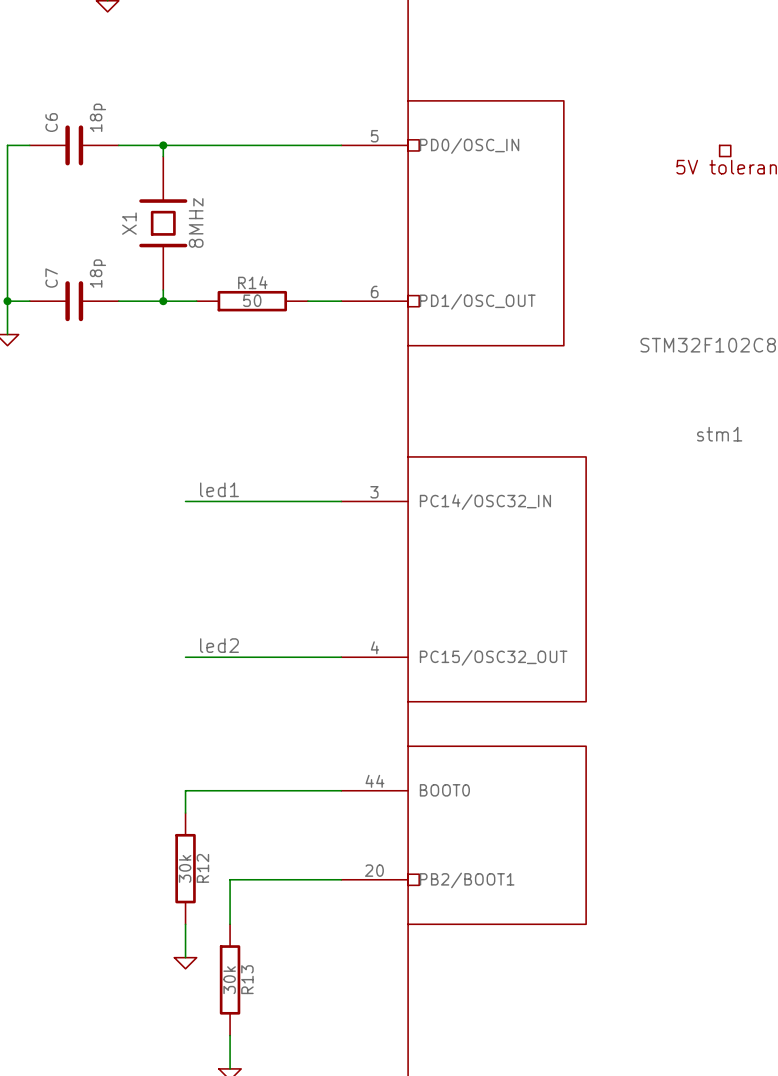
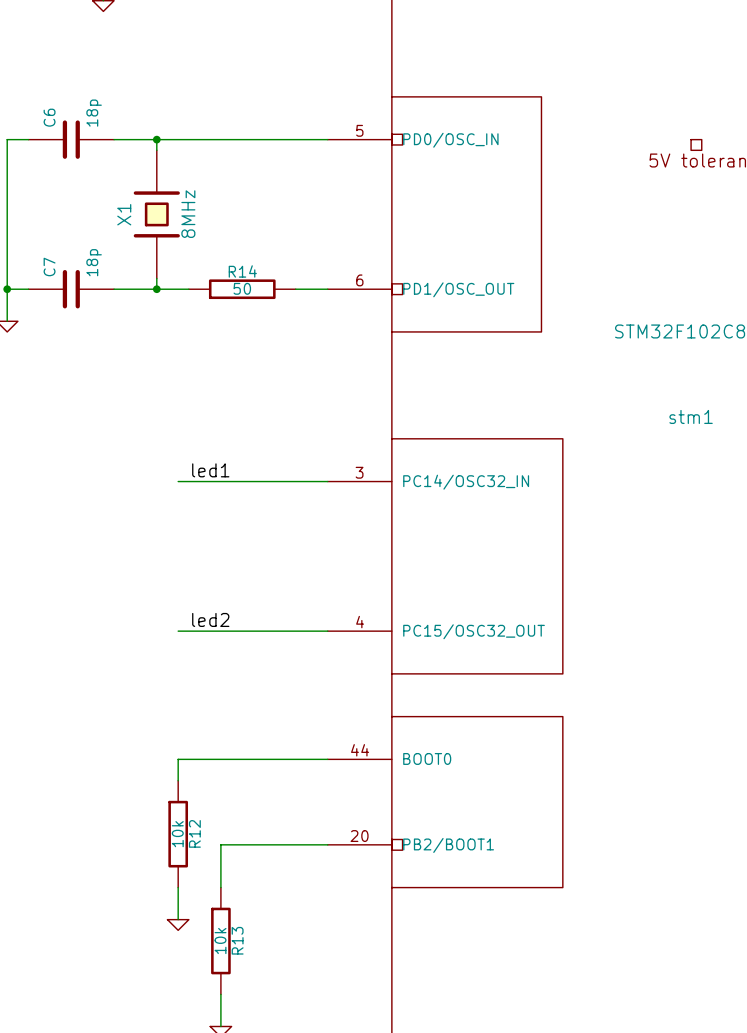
R12 value: 30k (185, 868) -> 10k (177, 834)
R13 value: 30k (229, 980) -> 10k (220, 941)

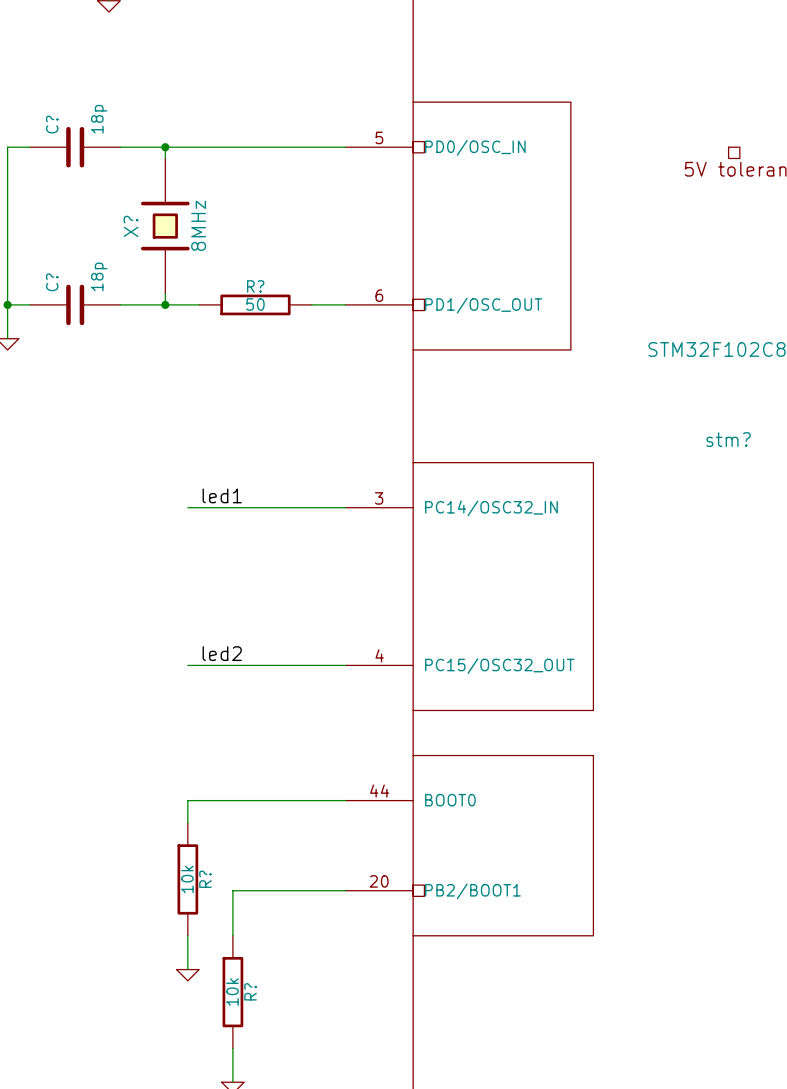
C6 name: C6 (49, 117) -> C? (52, 124)
X1 name: X1 (124, 214) -> X? (131, 226)
C7 name: C7 (49, 267) -> C? (52, 282)
R14 name: R14 (242, 271) -> R? (255, 286)
stm1 name: stm1 (691, 416) -> stm? (728, 439)
R12 name: R12 (194, 833) -> R? (205, 879)
R13 name: R13 (237, 940) -> R? (250, 991)

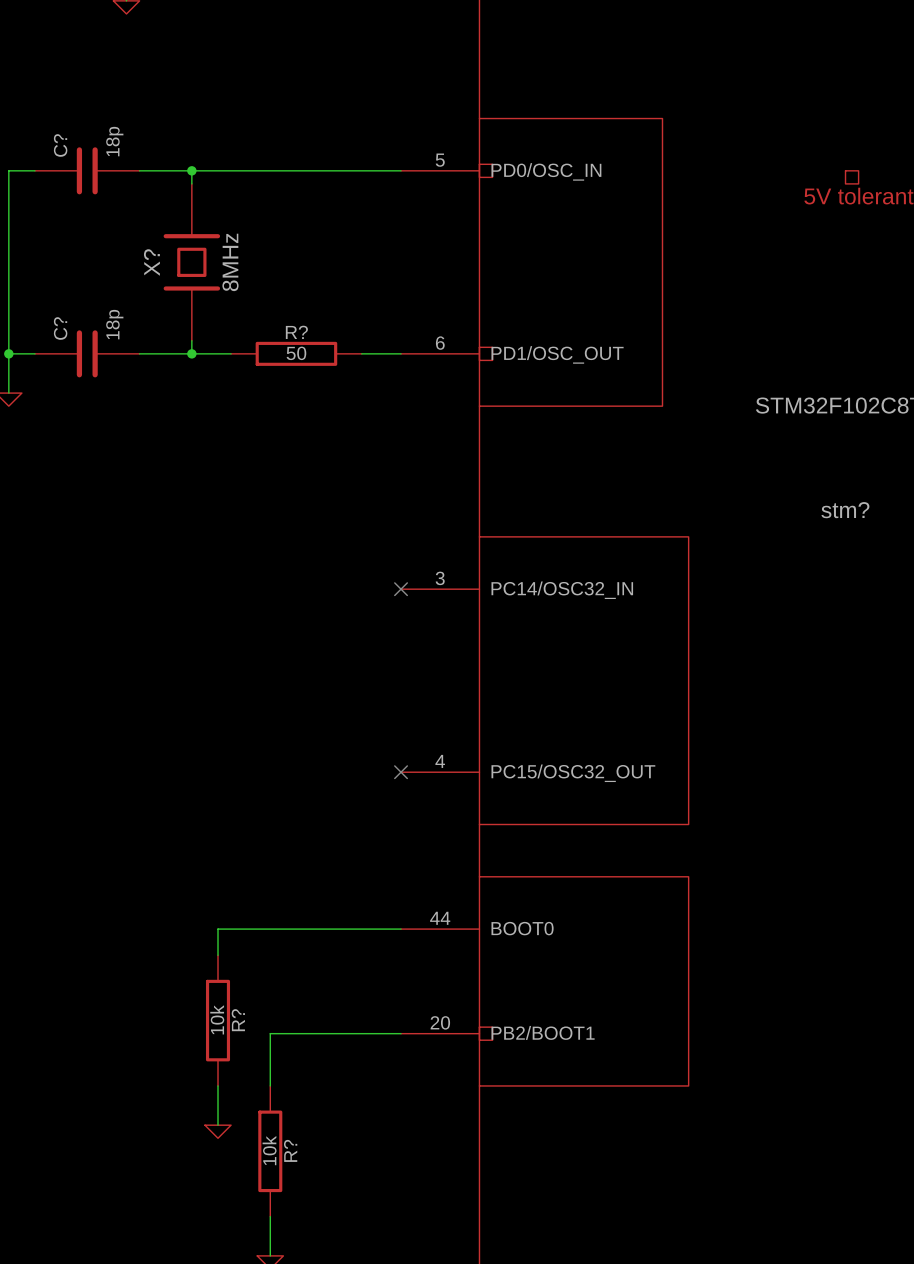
label: led1 (222, 495) -> none
wire: (187, 507) (345, 507) -> none
no-connect mark: none -> (401, 589)
label: led2 (222, 653) -> none
wire: (187, 665) (345, 665) -> none
no-connect mark: none -> (401, 772)

